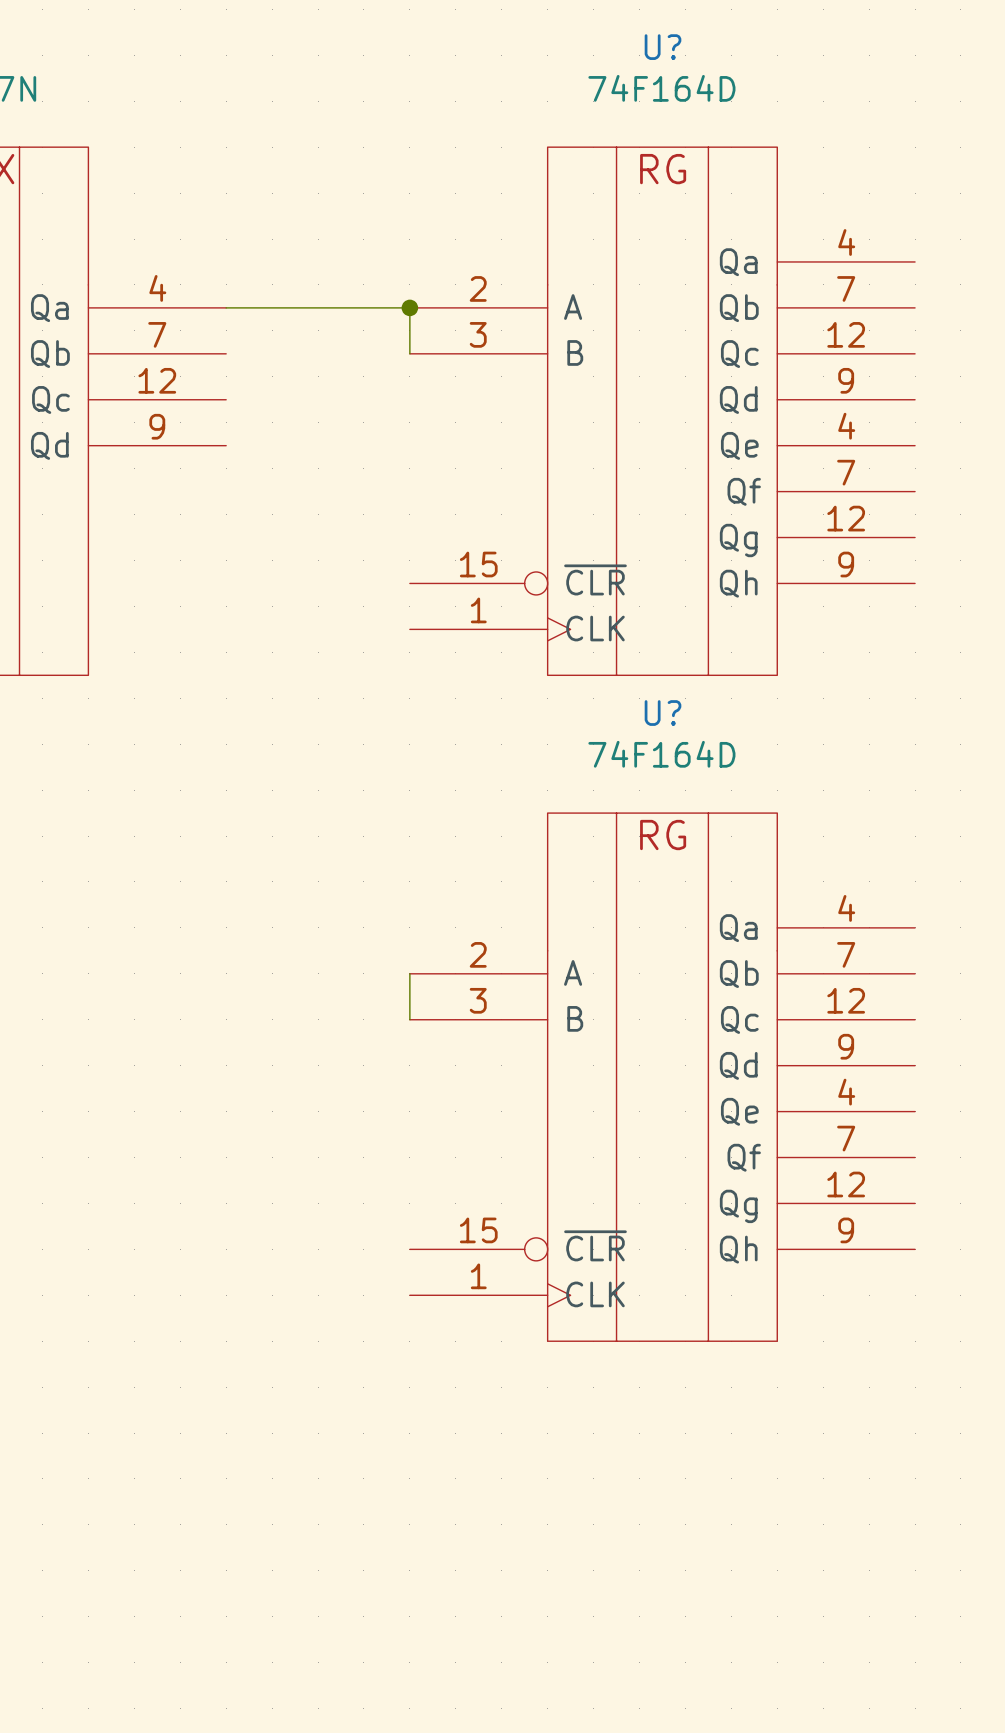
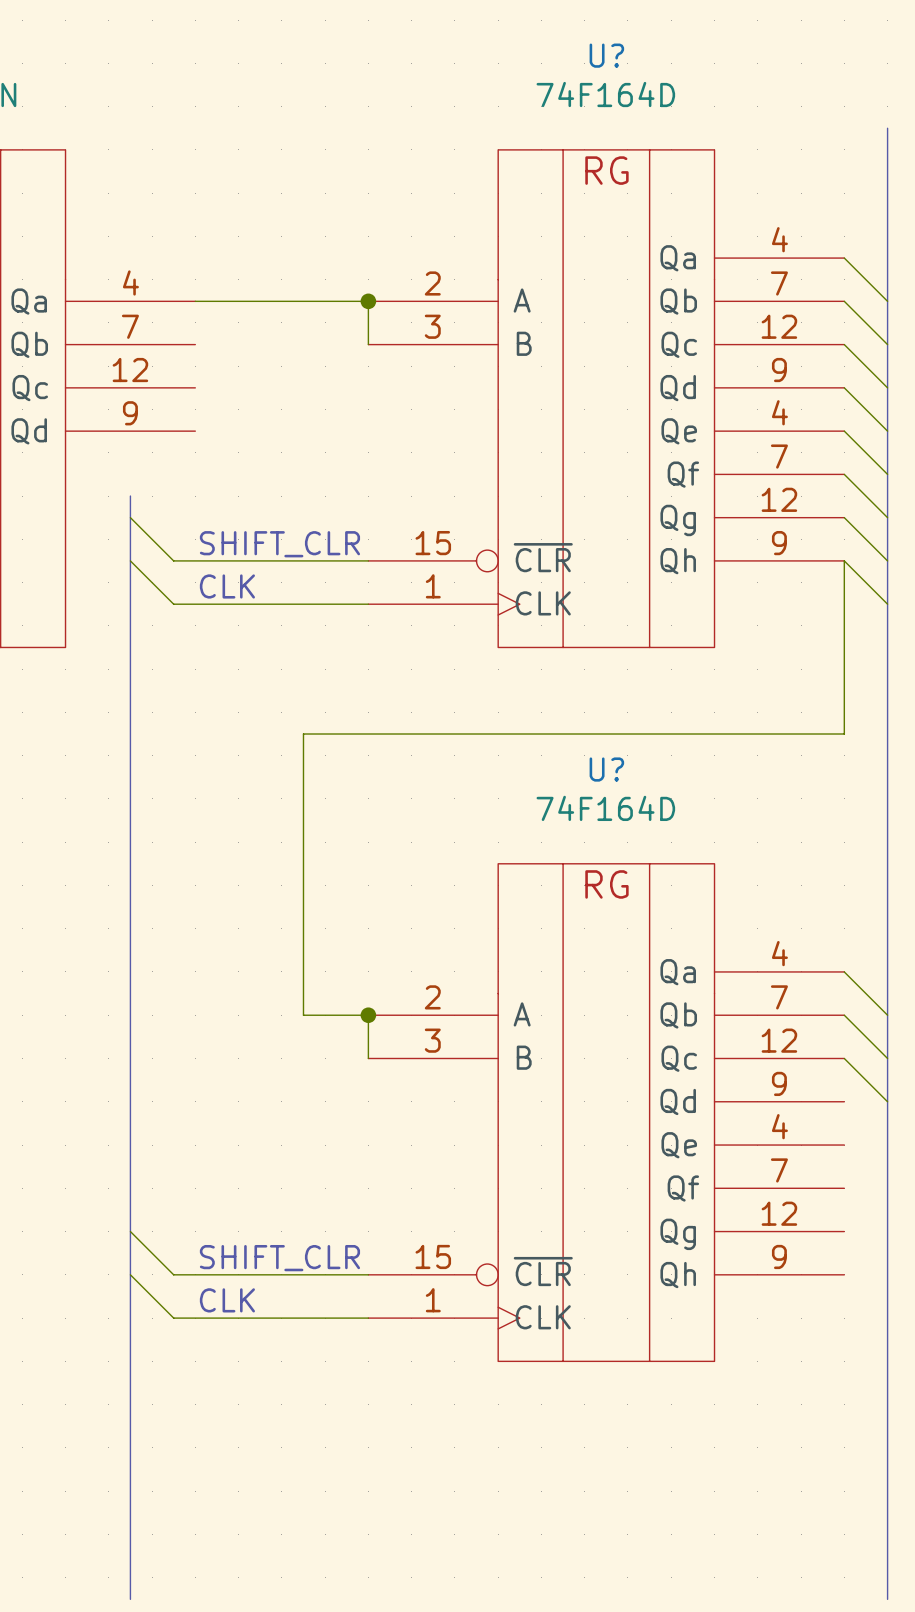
bus: none -> (887, 128) (887, 1599)
wire: none -> (844, 258) (887, 301)
wire: none -> (844, 301) (887, 344)
wire: none -> (844, 344) (887, 387)
wire: none -> (844, 387) (887, 431)
wire: none -> (844, 431) (887, 474)
wire: none -> (844, 474) (887, 517)
bus: none -> (130, 496) (130, 1599)
wire: none -> (130, 517) (173, 560) (368, 560)
wire: none -> (844, 517) (887, 560)
text: none -> SHIFT_CLR (279, 544)
wire: none -> (130, 560) (173, 604) (368, 604)
text: none -> CLK (227, 586)
wire: none -> (887, 604) (844, 560) (844, 734) (303, 734) (303, 1015) (368, 1015) (368, 1058)
wire: (409, 973) (409, 1019) -> none
wire: none -> (844, 971) (887, 1015)
junction: none -> (368, 1015)
wire: none -> (844, 1015) (887, 1058)
U? position: (662, 1077) -> (606, 1112)
wire: none -> (844, 1058) (887, 1101)
wire: none -> (130, 1231) (173, 1274) (368, 1274)
text: none -> SHIFT_CLR (279, 1258)
wire: none -> (130, 1274) (173, 1318) (368, 1318)
text: none -> CLK (227, 1300)

